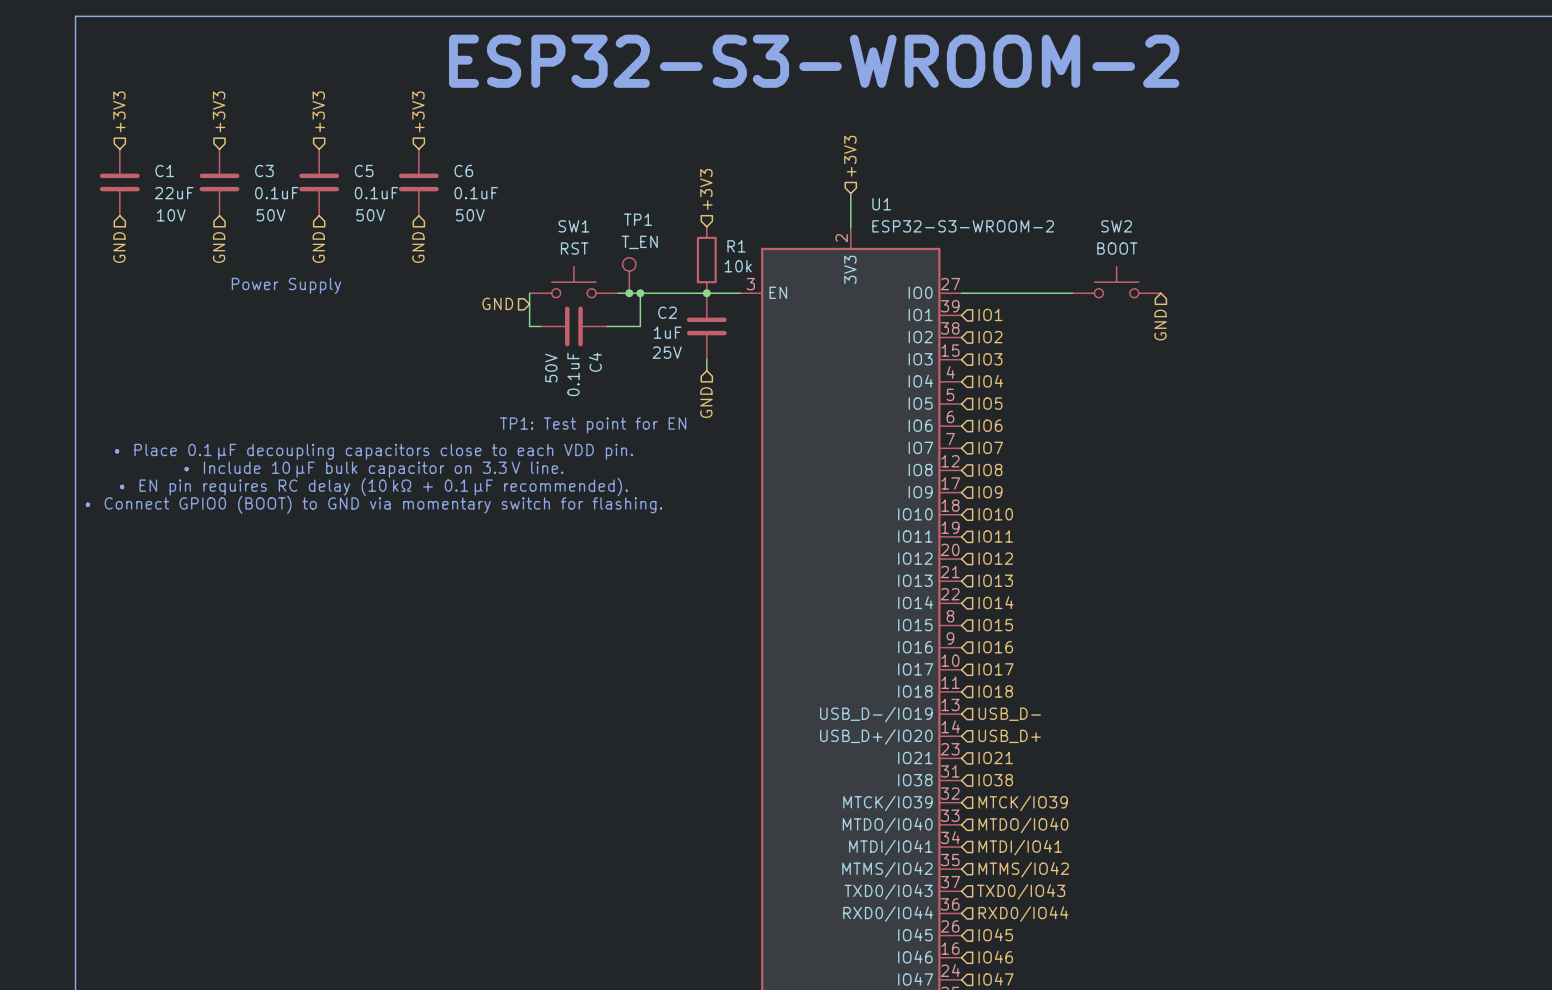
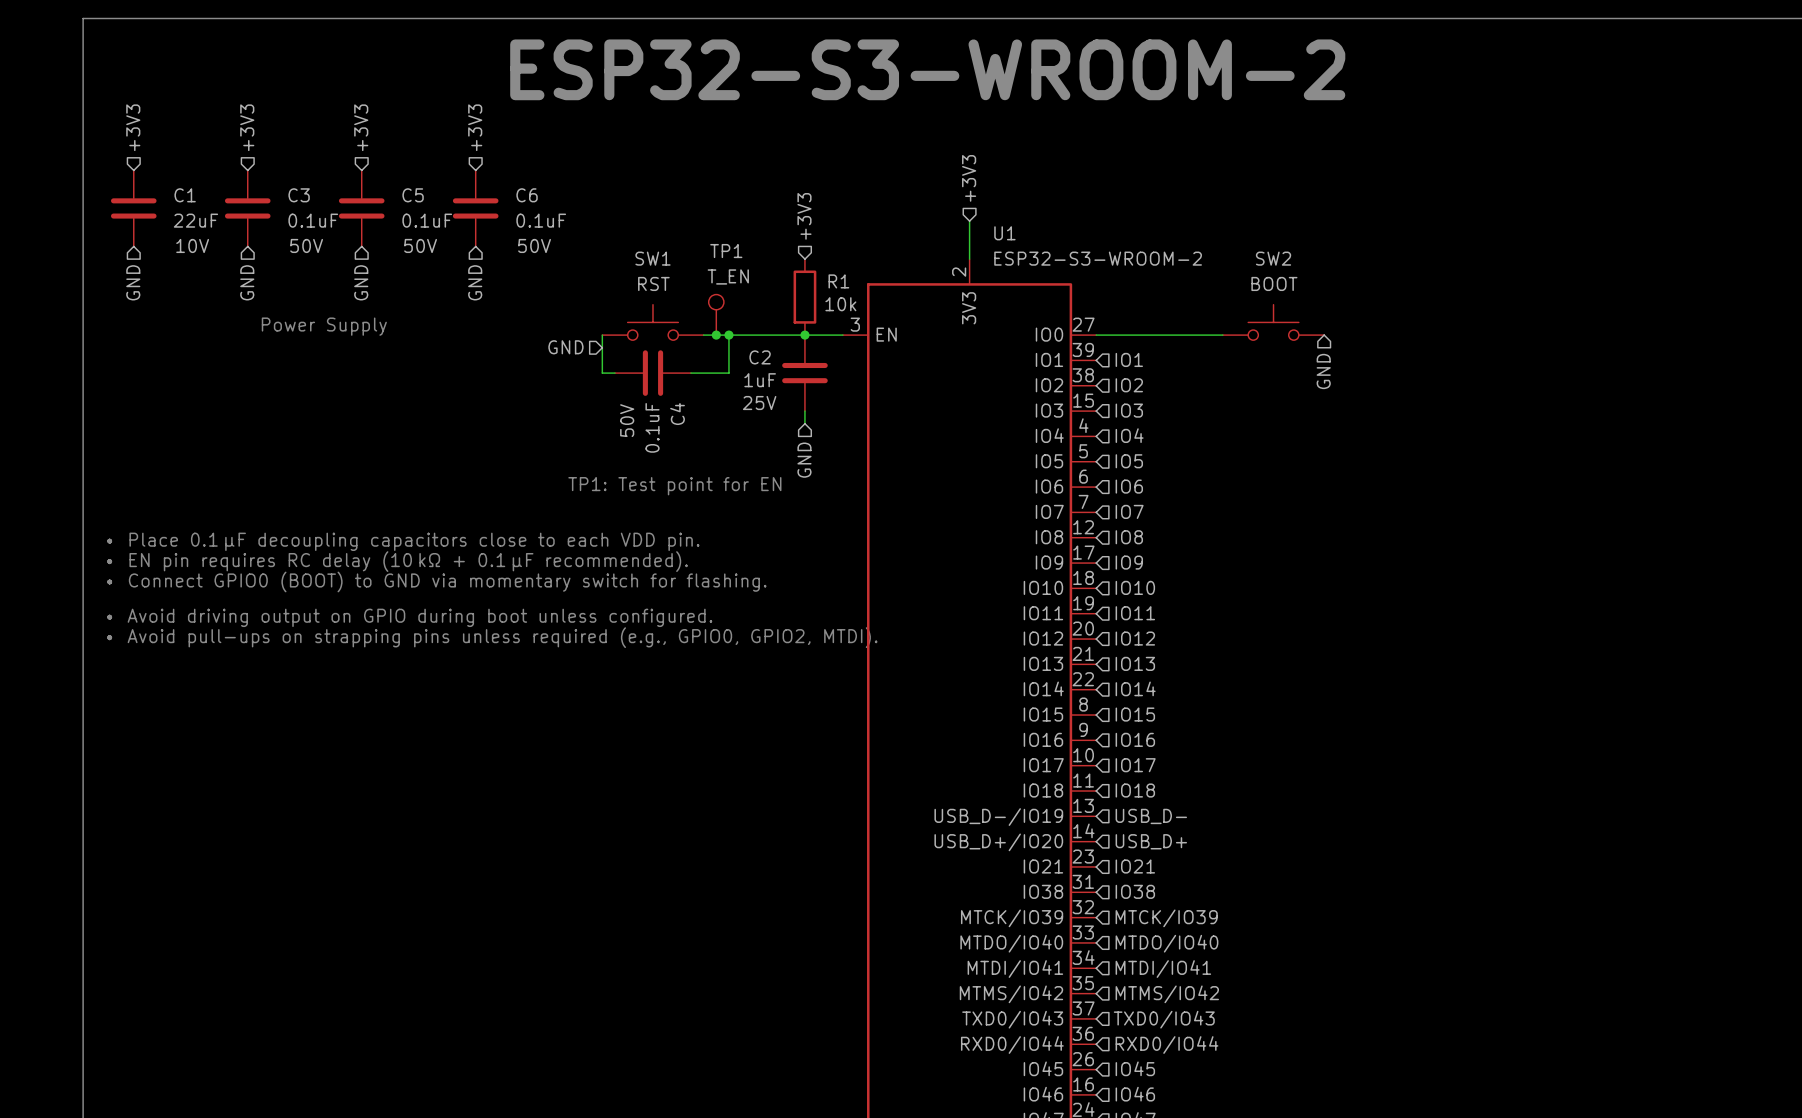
text: • Place 0.1 µF decoupling capacitors close to each VDD pin. (373, 451) -> none
text: • Include 10 µF bulk capacitor on 3.3 V line. (373, 469) -> none
text: none -> • Place 0.1 µF decoupling capacitors close to each VDD pin. (403, 541)
text: • EN pin requires RC delay (10 kΩ + 0.1 µF recommended). (373, 486) -> none
text: none -> • EN pin requires RC delay (10 kΩ + 0.1 µF recommended). (397, 561)
text: • Connect GPIO0 (BOOT) to GND via momentary switch for flashing. (373, 504) -> none
text: none -> • Connect GPIO0 (BOOT) to GND via momentary switch for flashing. (436, 581)
text: none -> • Avoid driving output on GPIO during boot unless configured. (409, 617)
text: none -> • Avoid pull-ups on strapping pins unless required (e.g., GPIO0, GPIO2, MTDI). (492, 637)

